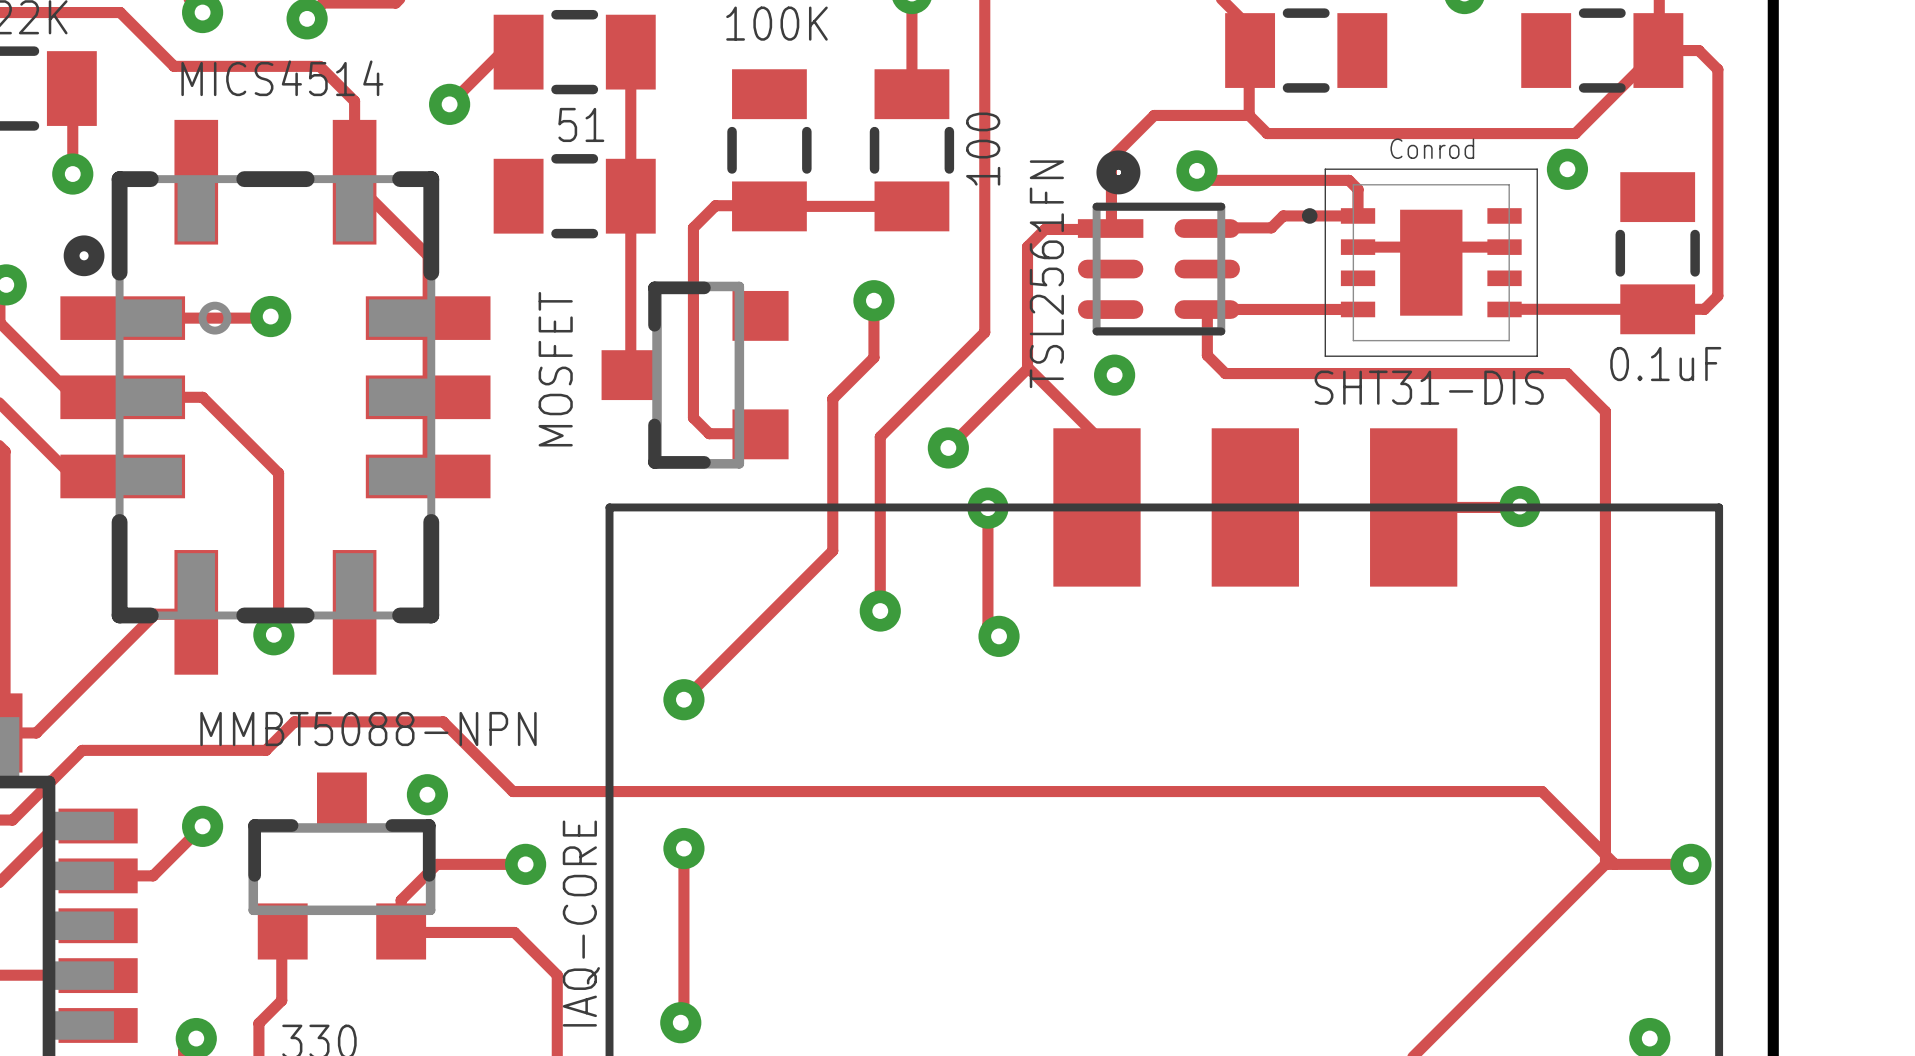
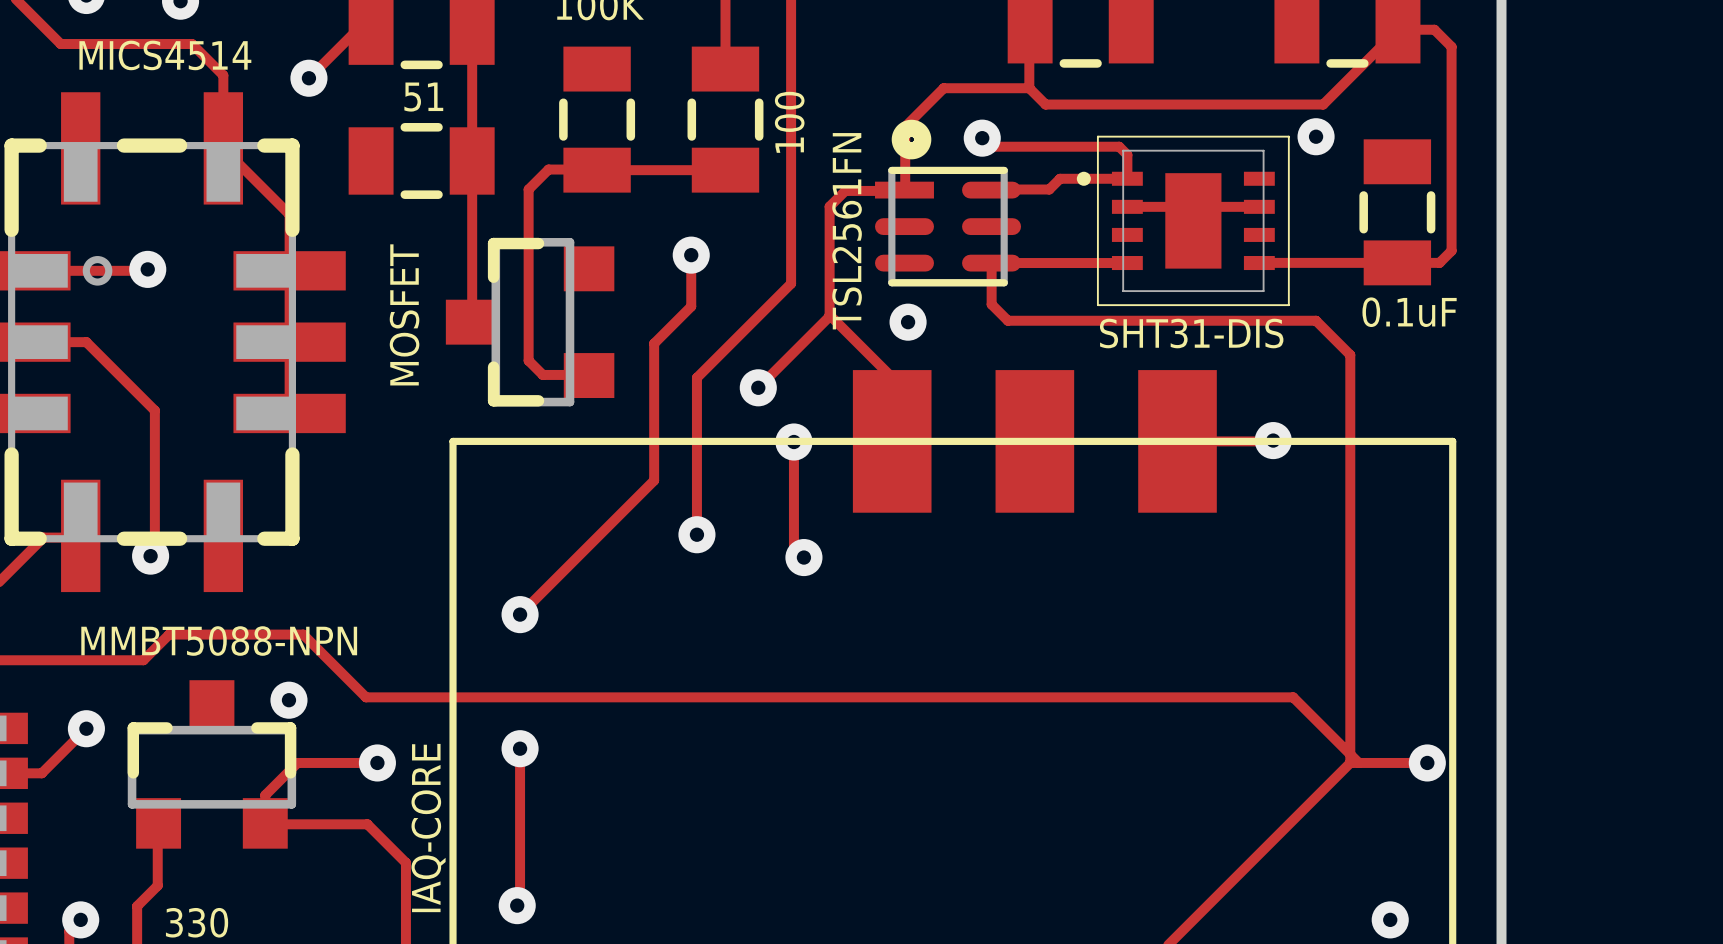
text: Conrod (1432, 148) -> none

